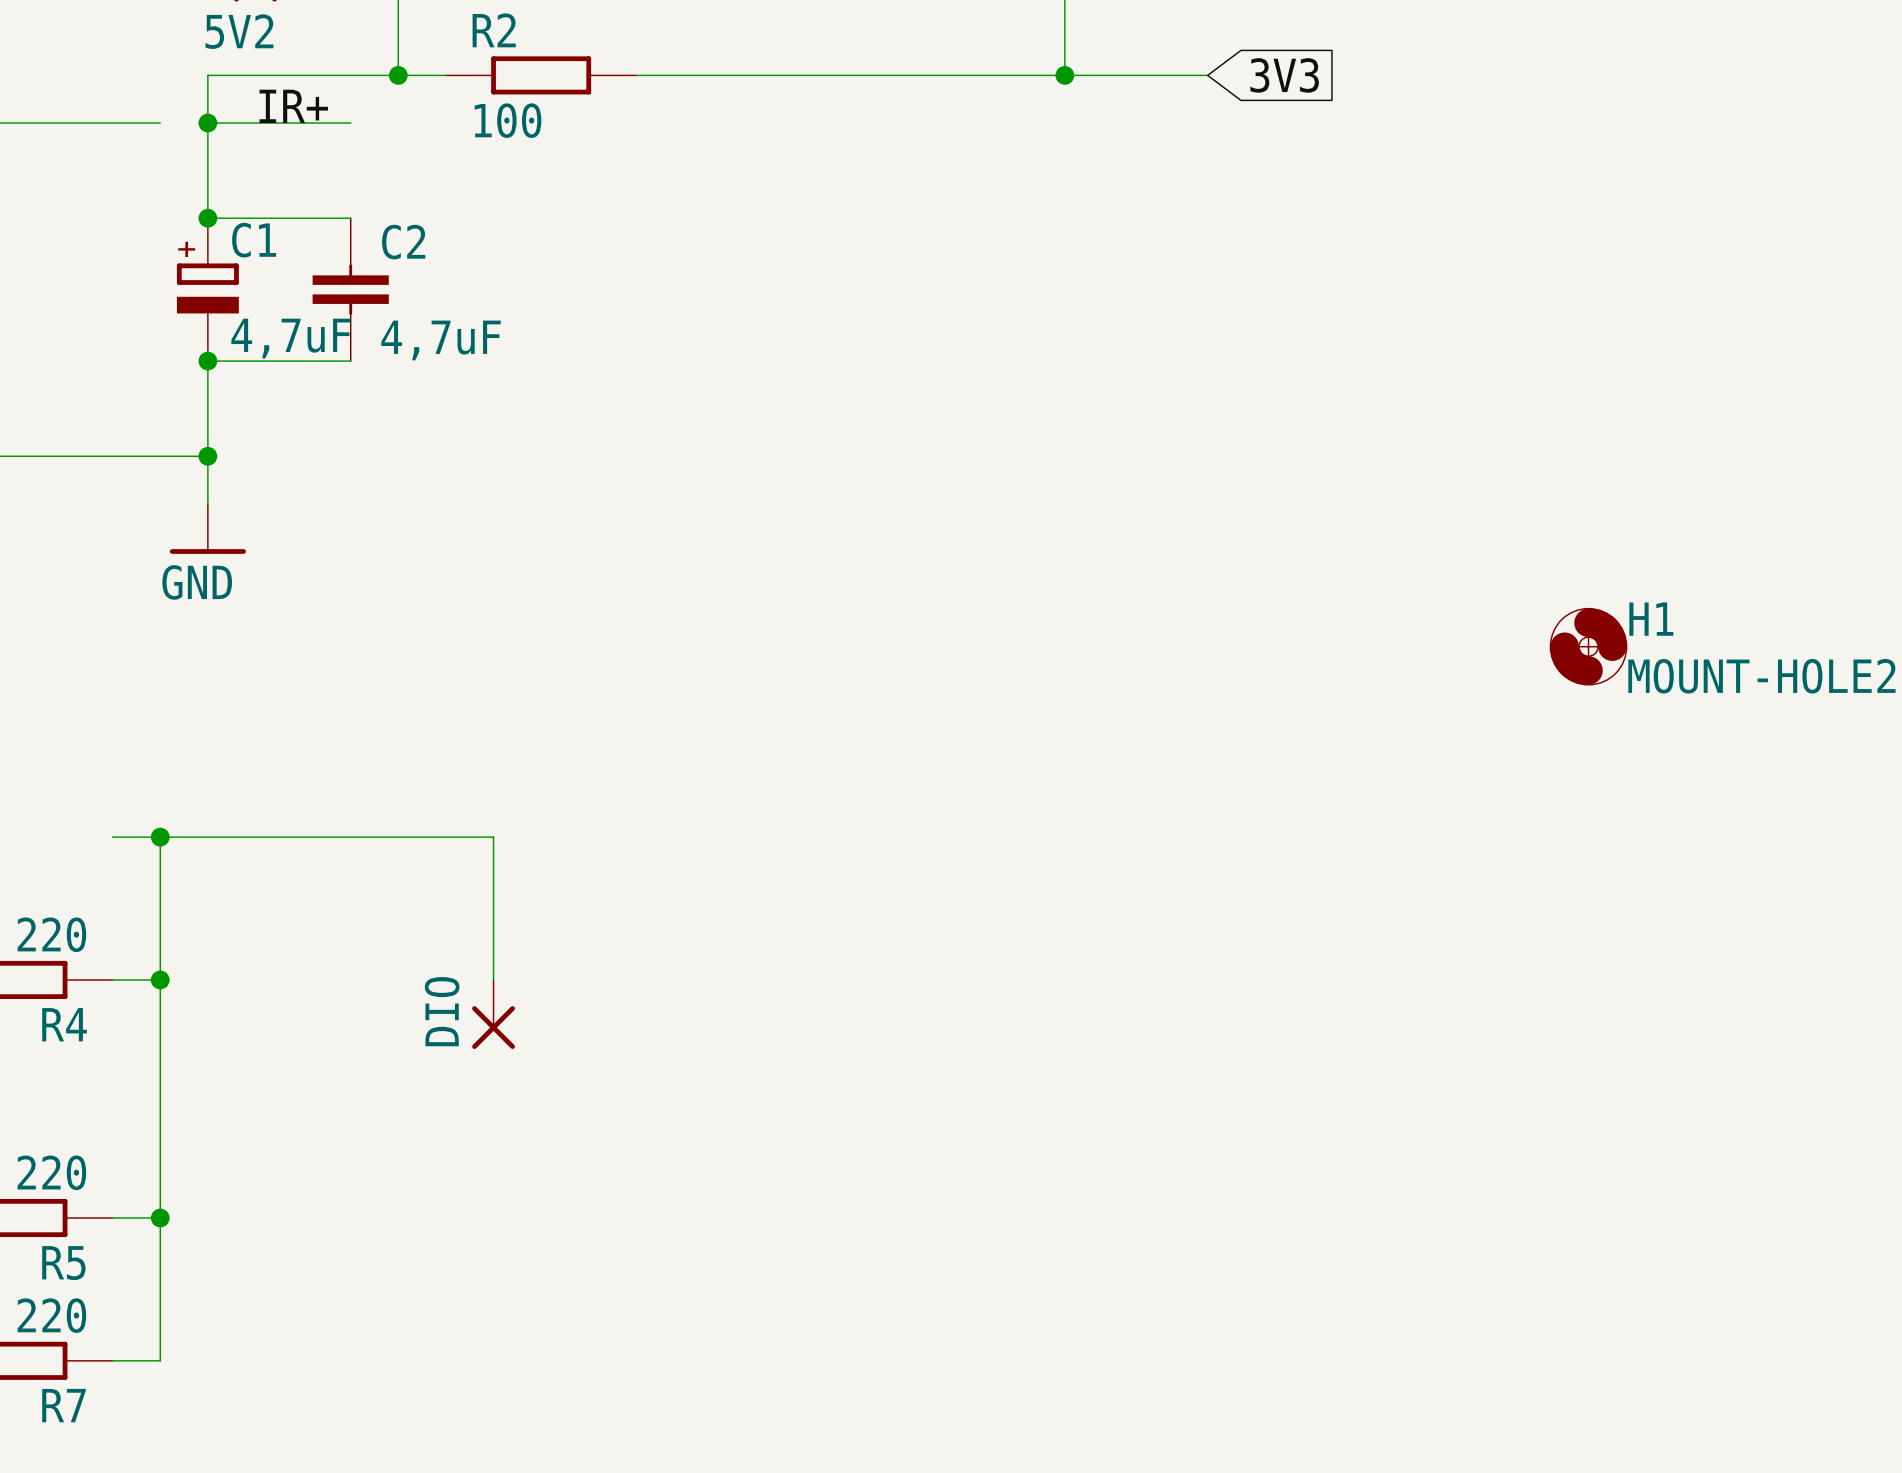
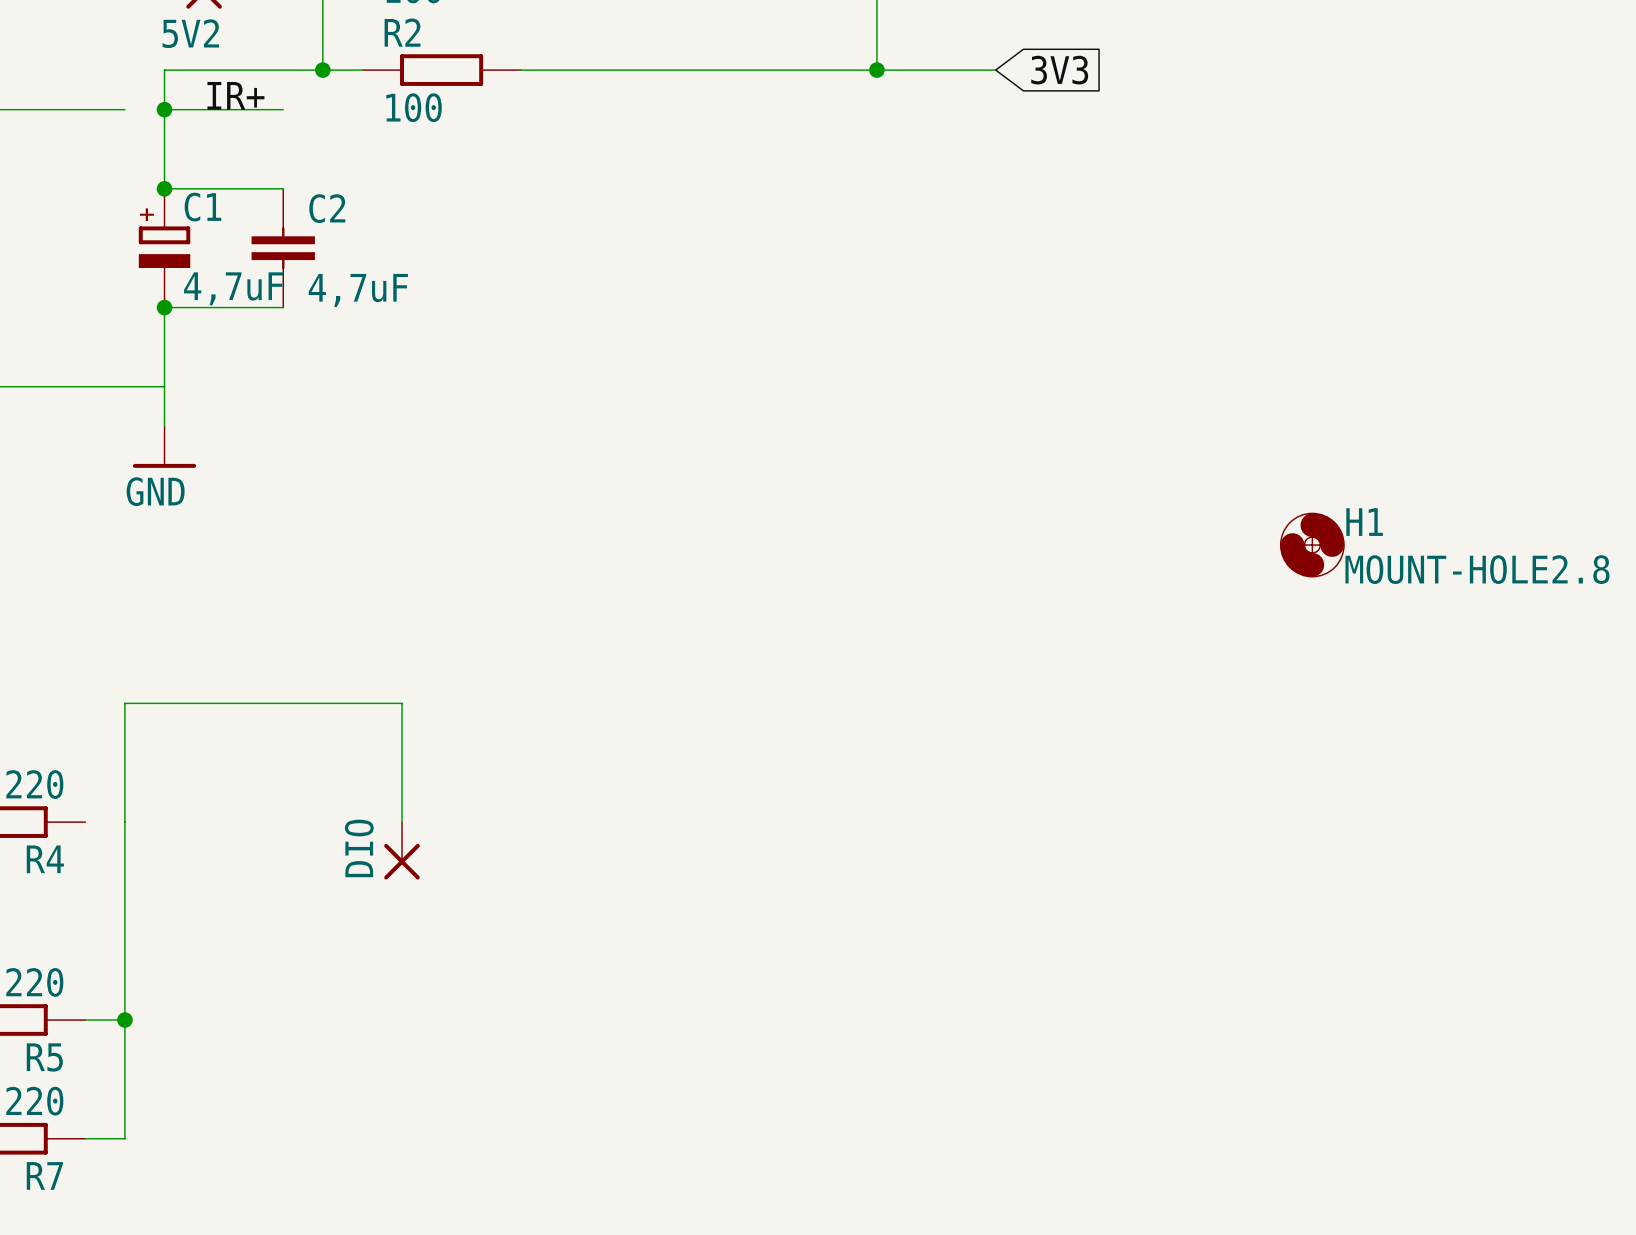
junction: (207, 456) -> none
wire: (112, 837) (160, 837) -> none
junction: (160, 837) -> none
wire: (112, 979) (160, 979) -> none
junction: (160, 979) -> none

